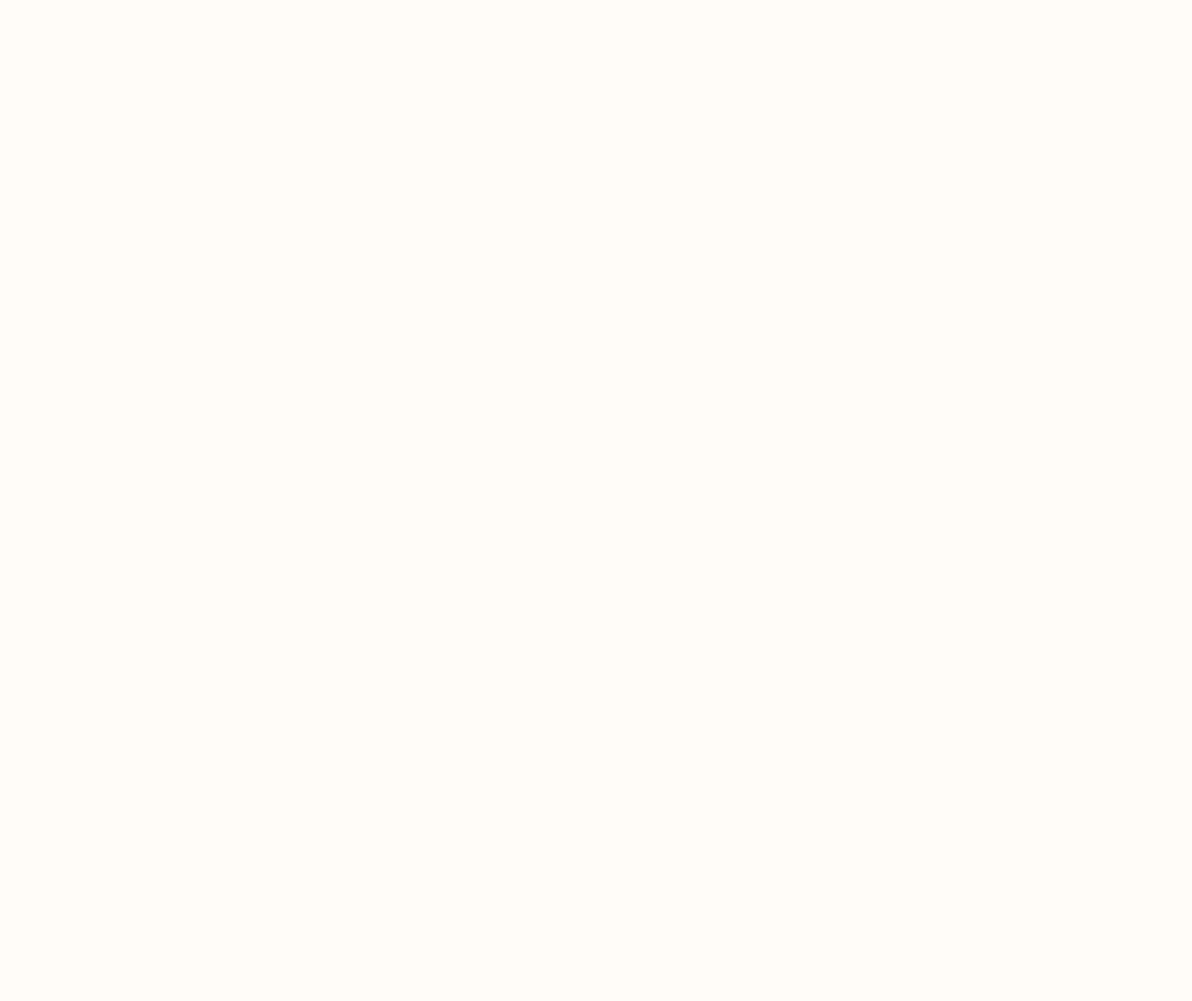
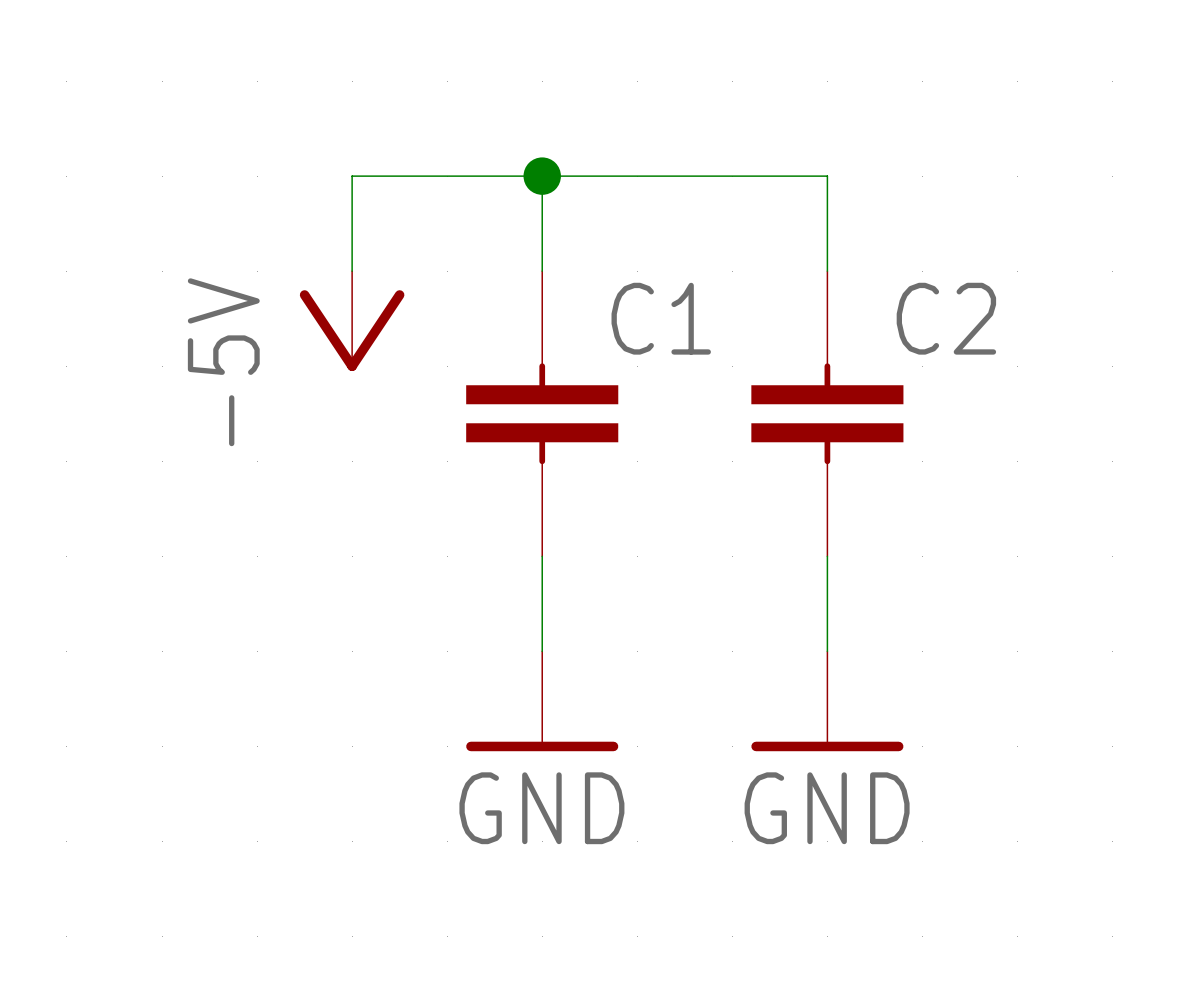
wire: none -> (542, 176) (542, 271)
junction: none -> (542, 176)
wire: none -> (352, 271) (352, 176) (827, 176) (827, 271)
power symbol: none -> -5V (352, 321)
C1: none -> (542, 413)
C2: none -> (827, 413)
wire: none -> (542, 556) (542, 651)
wire: none -> (827, 556) (827, 651)
power symbol: none -> GND (542, 701)
power symbol: none -> GND (827, 701)

